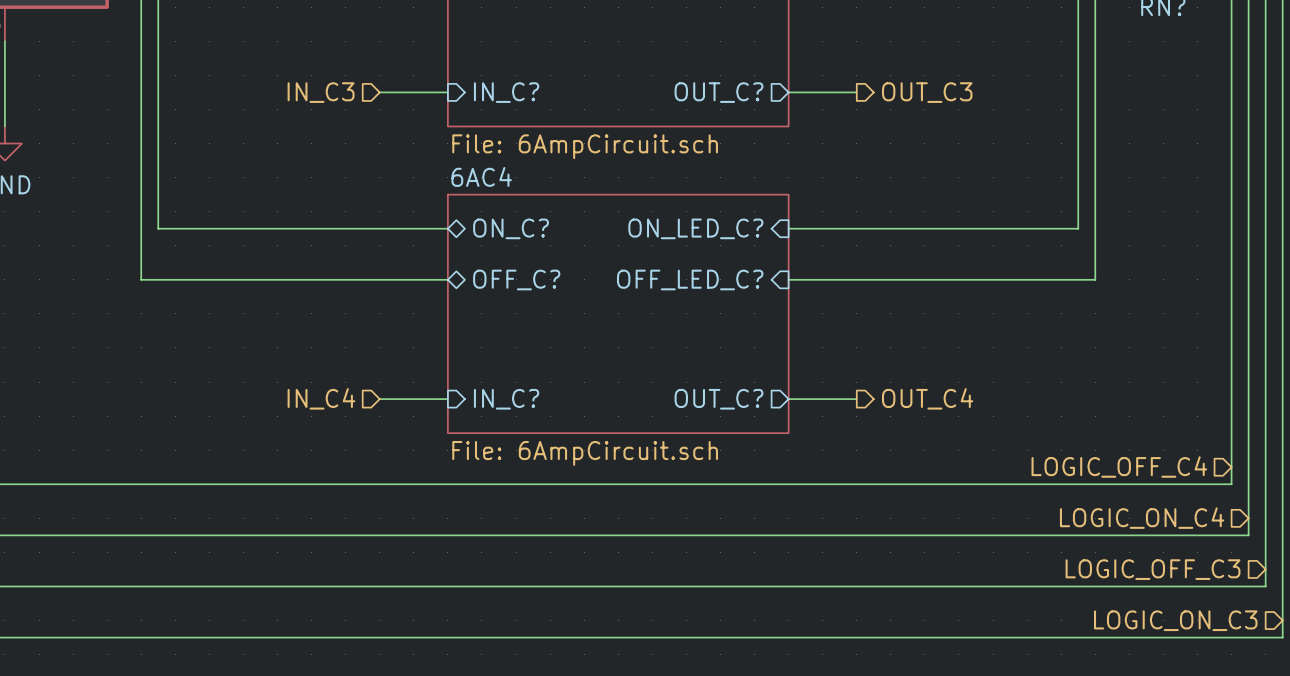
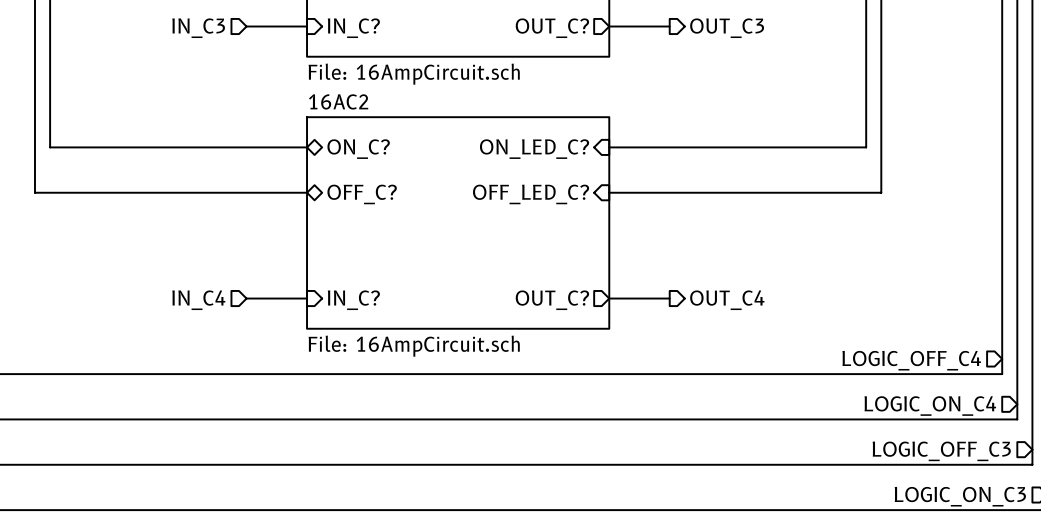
sheet value: File: 6AmpCircuit.sch (585, 146) -> File: 16AmpCircuit.sch (414, 74)
sheet 6AC4 name: 6AC4 (481, 176) -> 16AC2 (338, 101)
sheet 6AC4 value: File: 6AmpCircuit.sch (585, 453) -> File: 16AmpCircuit.sch (414, 346)

